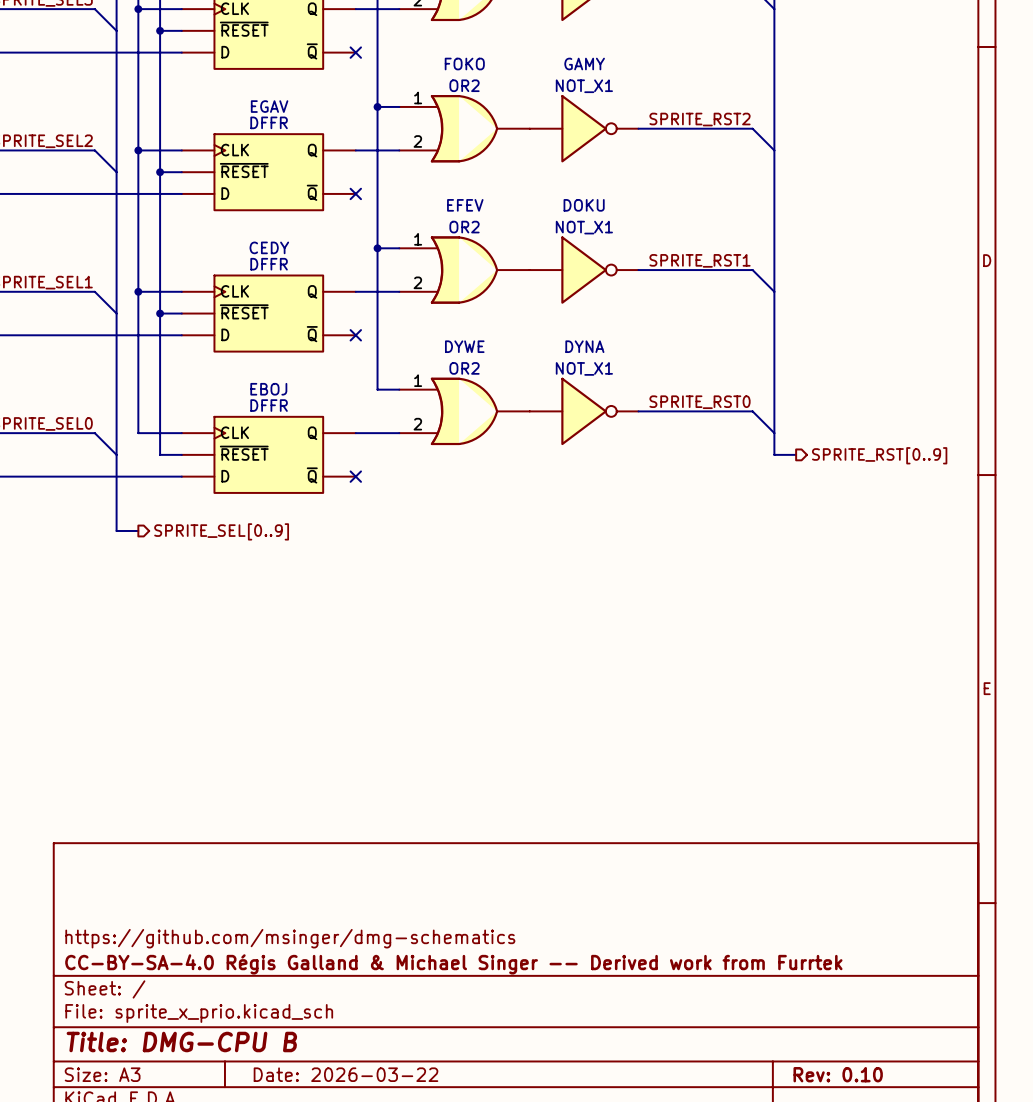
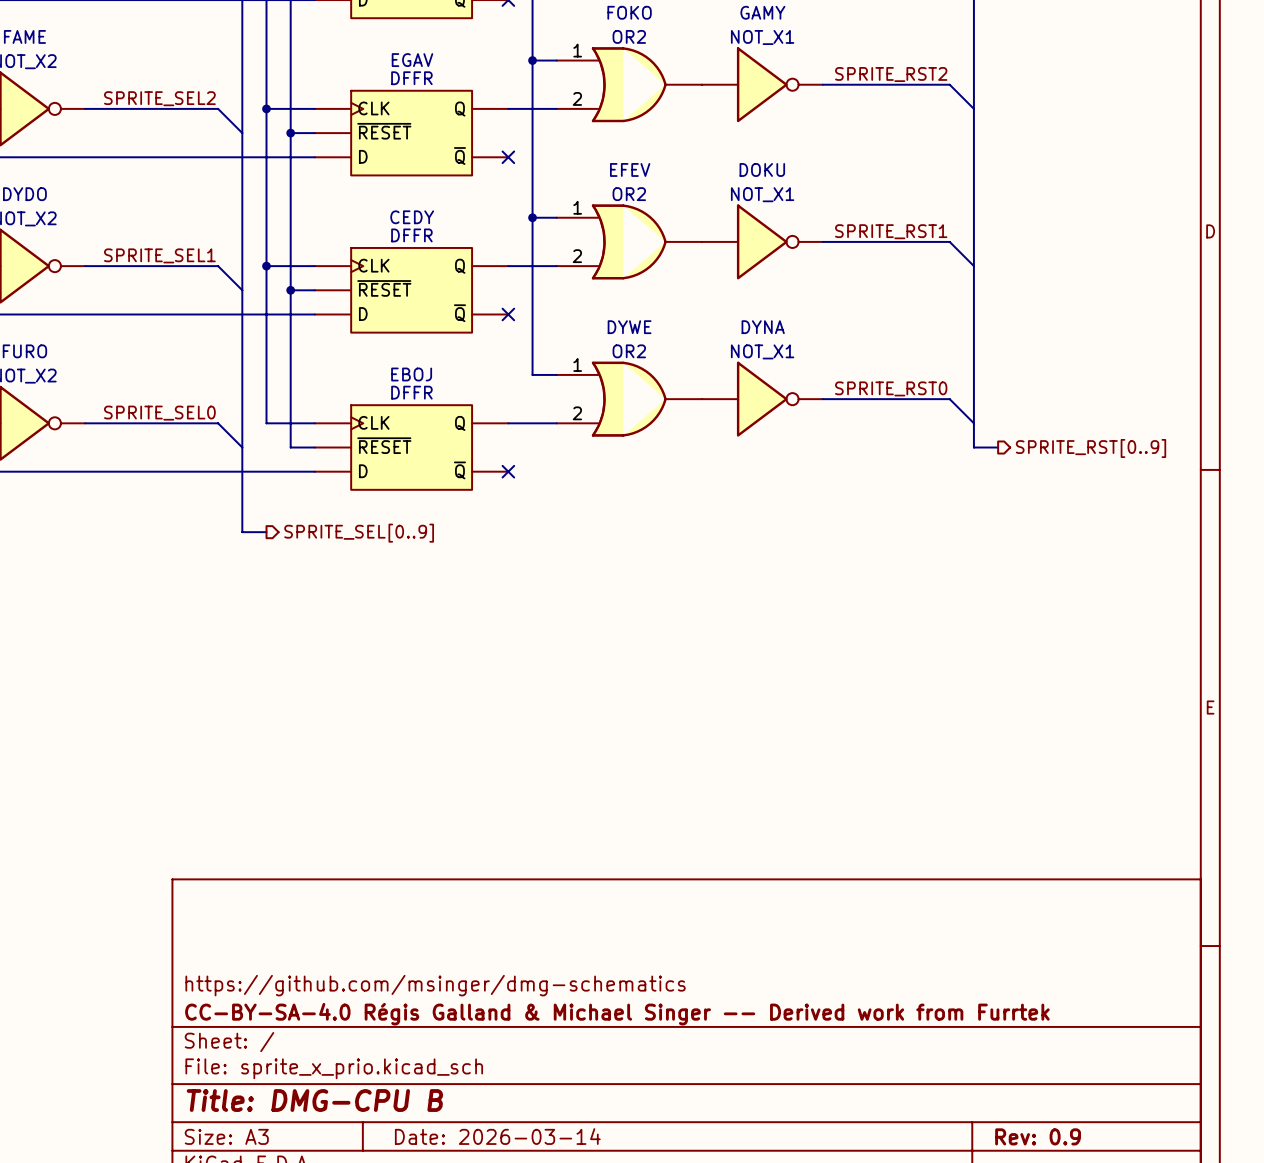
title block: Date: 2026-03-22 (346, 1074) -> Date: 2026-03-14 (497, 1136)
title block: Rev: 0.10 (838, 1074) -> Rev: 0.9 (1038, 1136)

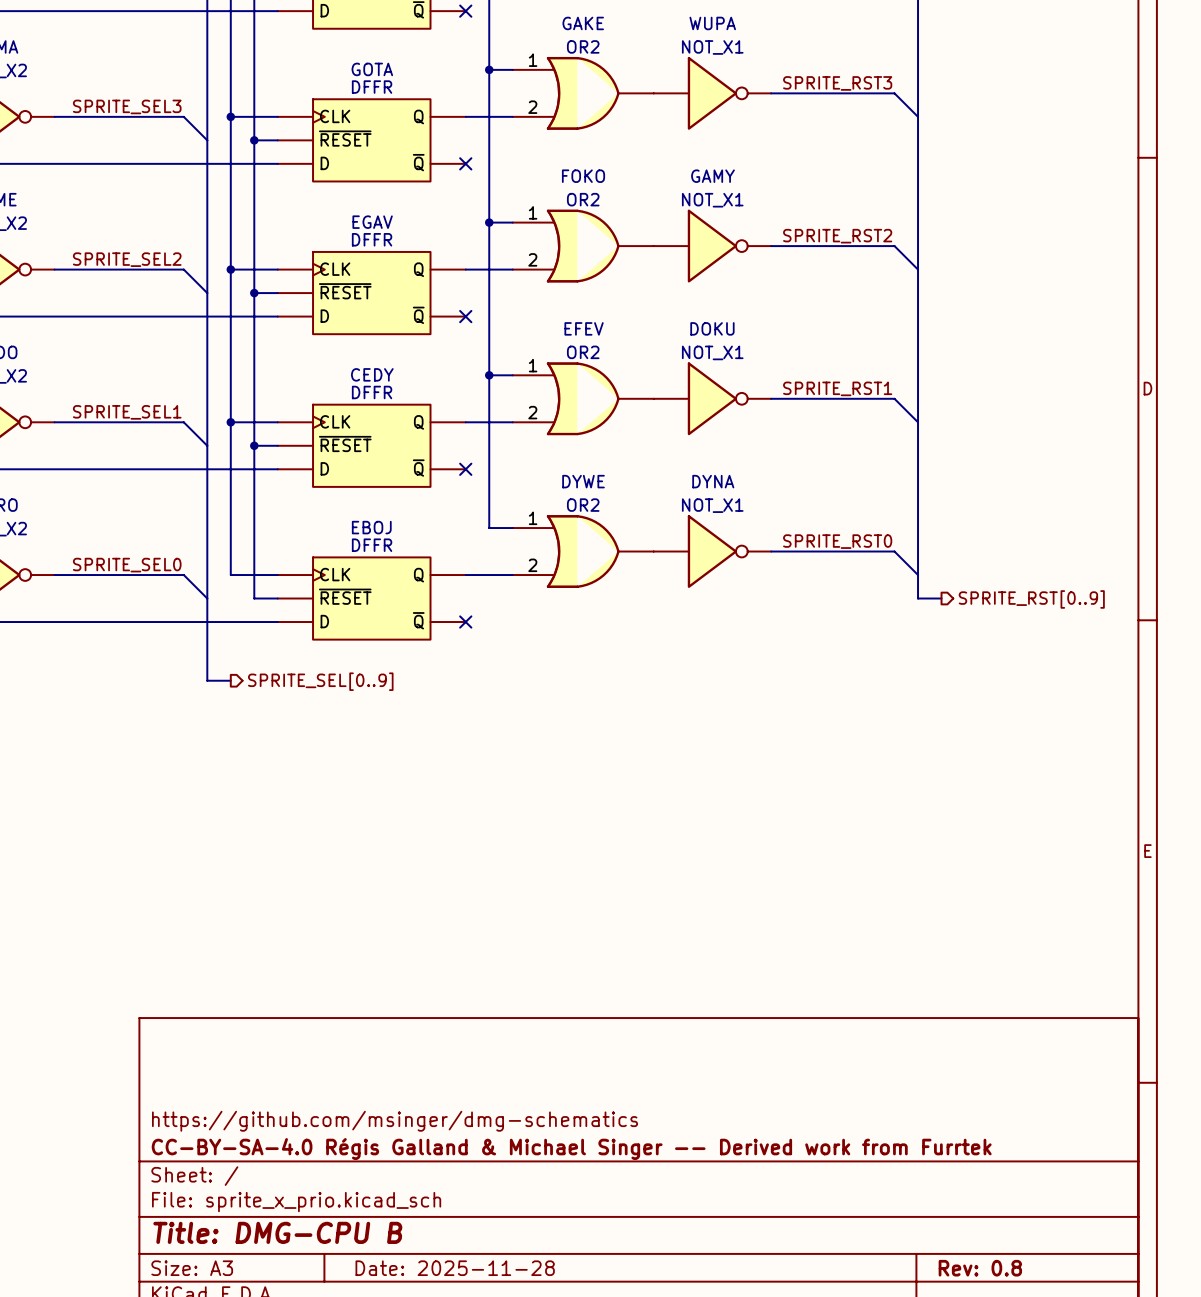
title block: Date: 2026-03-14 (497, 1136) -> Date: 2025-11-28 (455, 1268)
title block: Rev: 0.9 (1038, 1136) -> Rev: 0.8 (980, 1268)

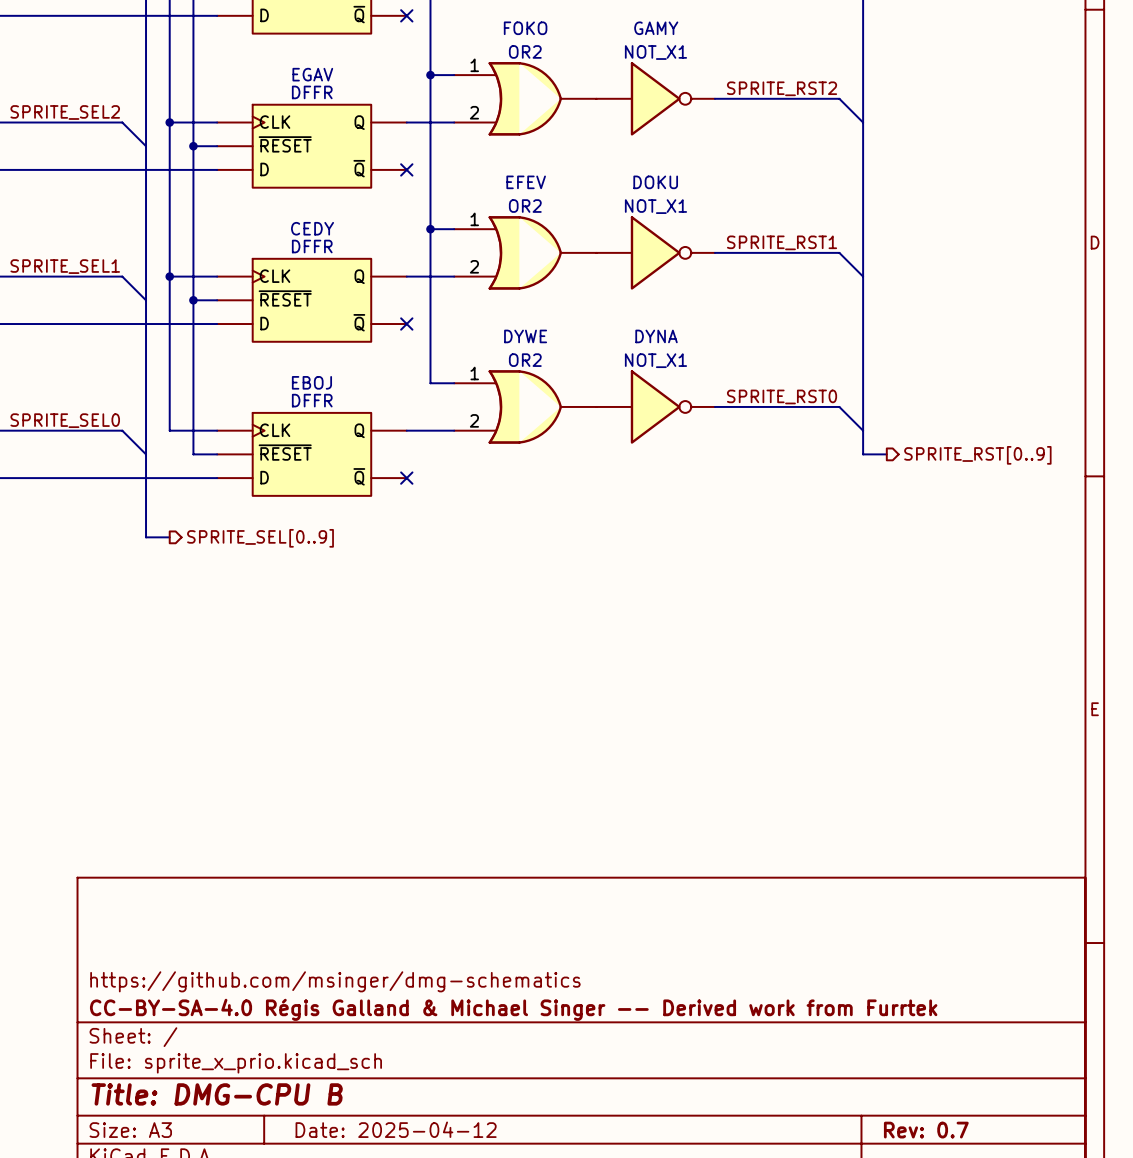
title block: Date: 2025-11-28 (455, 1268) -> Date: 2025-04-12 (396, 1129)
title block: Rev: 0.8 (980, 1268) -> Rev: 0.7 (926, 1130)

